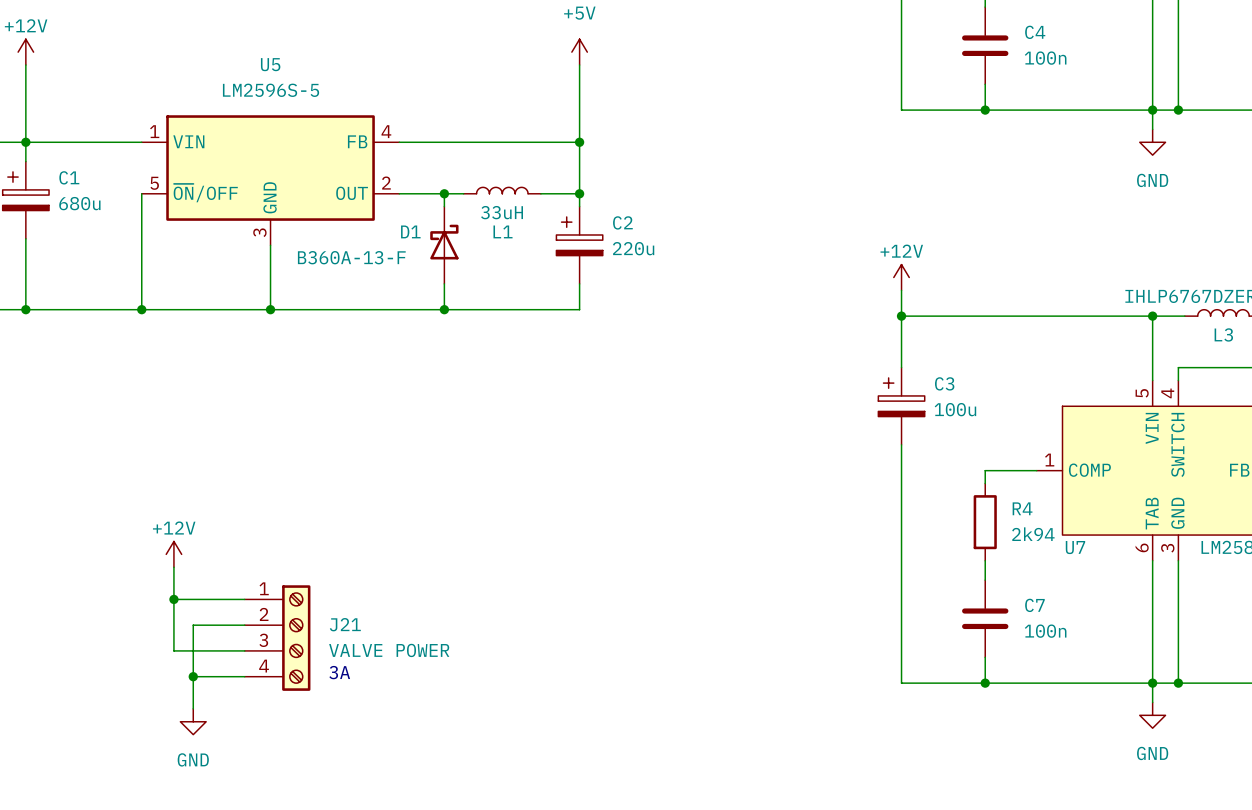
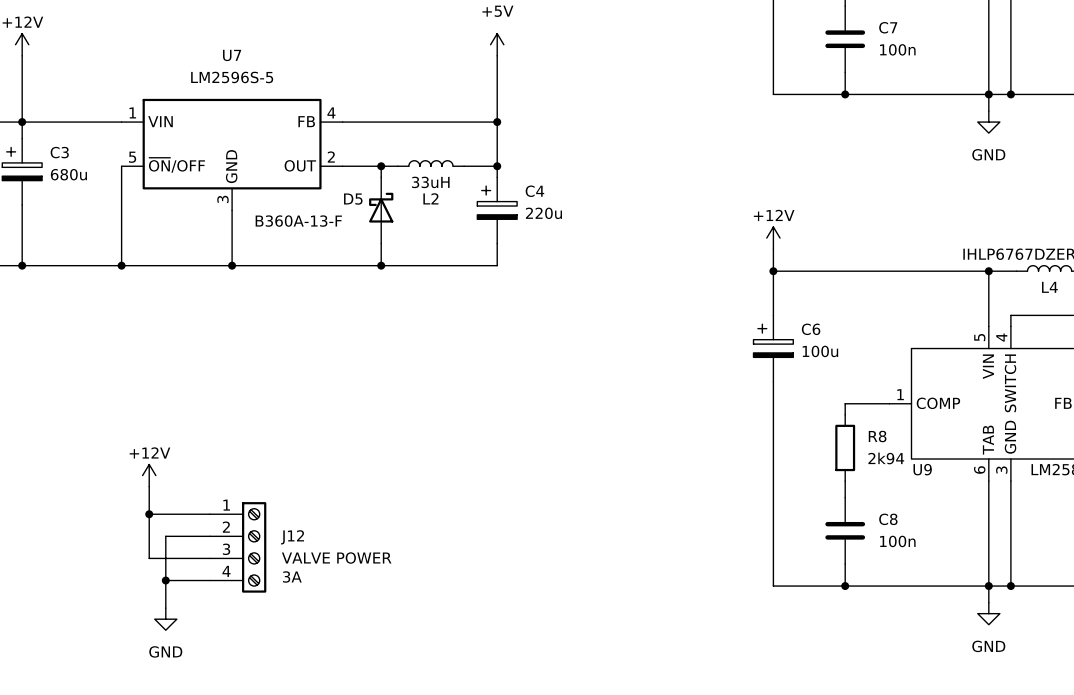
C4 name: C4 (1035, 32) -> C7 (888, 27)
U5 name: U5 (270, 64) -> U7 (232, 55)
C1 name: C1 (69, 177) -> C3 (59, 152)
C2 name: C2 (622, 222) -> C4 (534, 191)
D1 name: D1 (410, 231) -> D5 (353, 199)
L1 name: L1 (503, 231) -> L2 (430, 198)
L3 name: L3 (1223, 334) -> L4 (1049, 287)
C3 name: C3 (944, 383) -> C6 (811, 329)
R4 name: R4 (1022, 508) -> R8 (877, 436)
U7 name: U7 (1075, 547) -> U9 (922, 469)
C7 name: C7 (1034, 605) -> C8 (888, 519)
J21 name: J21 (345, 624) -> J12 (292, 537)

